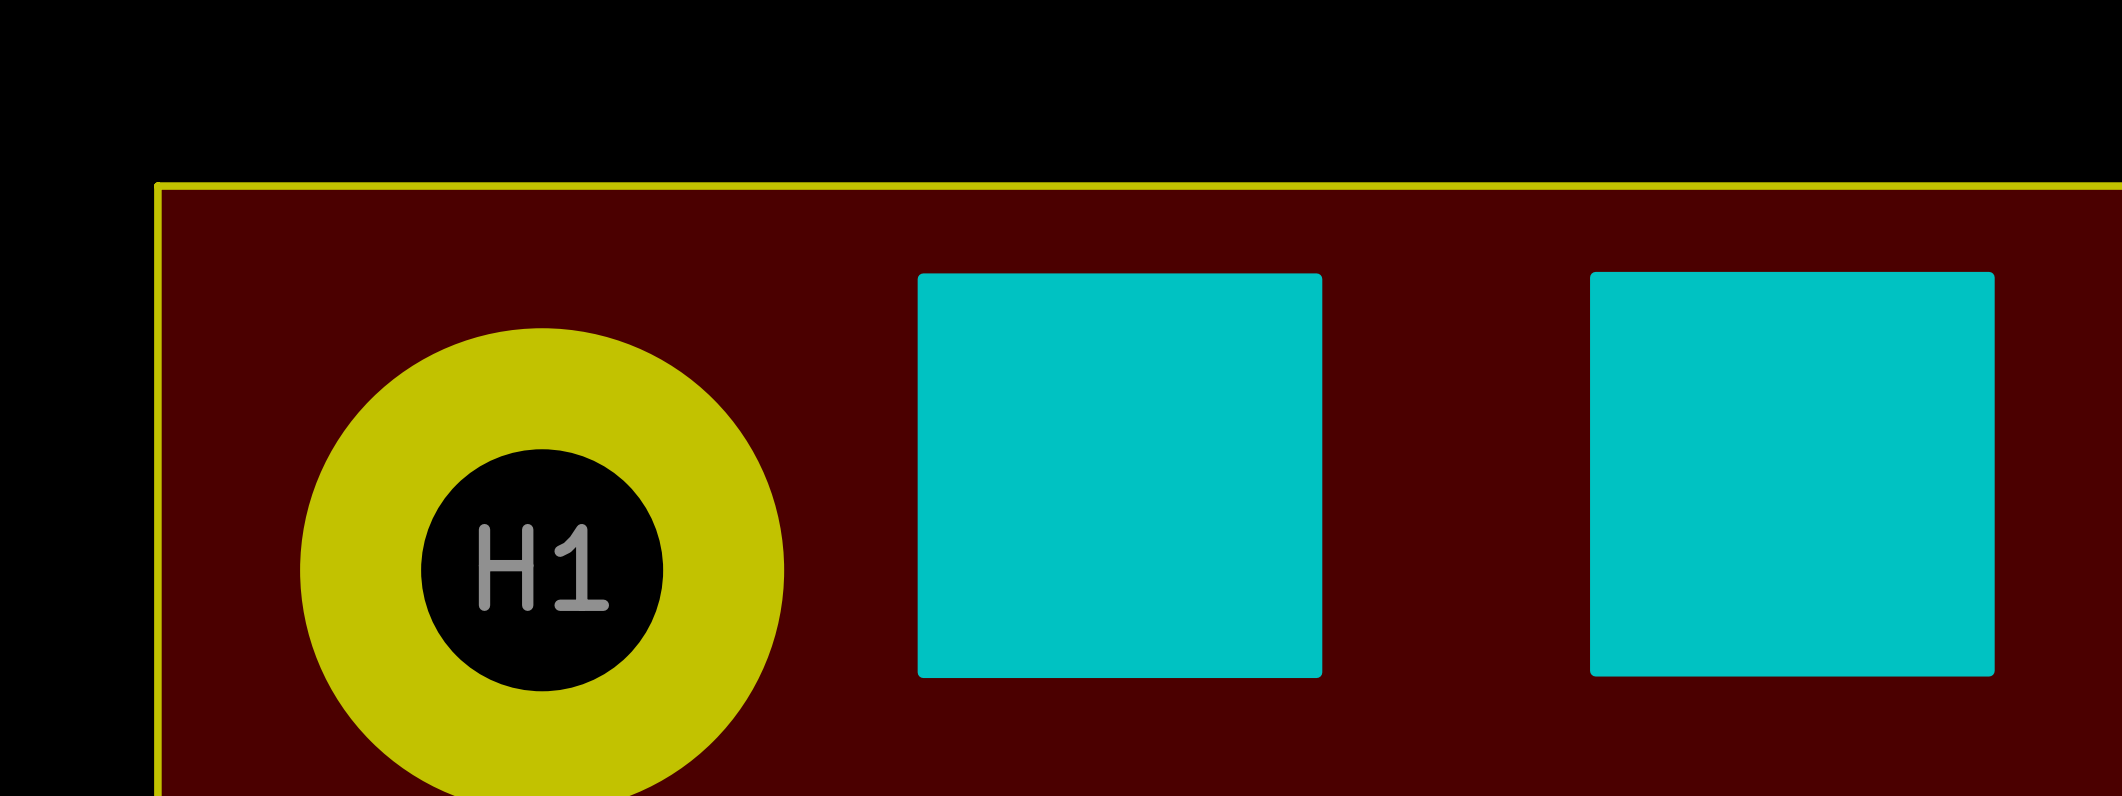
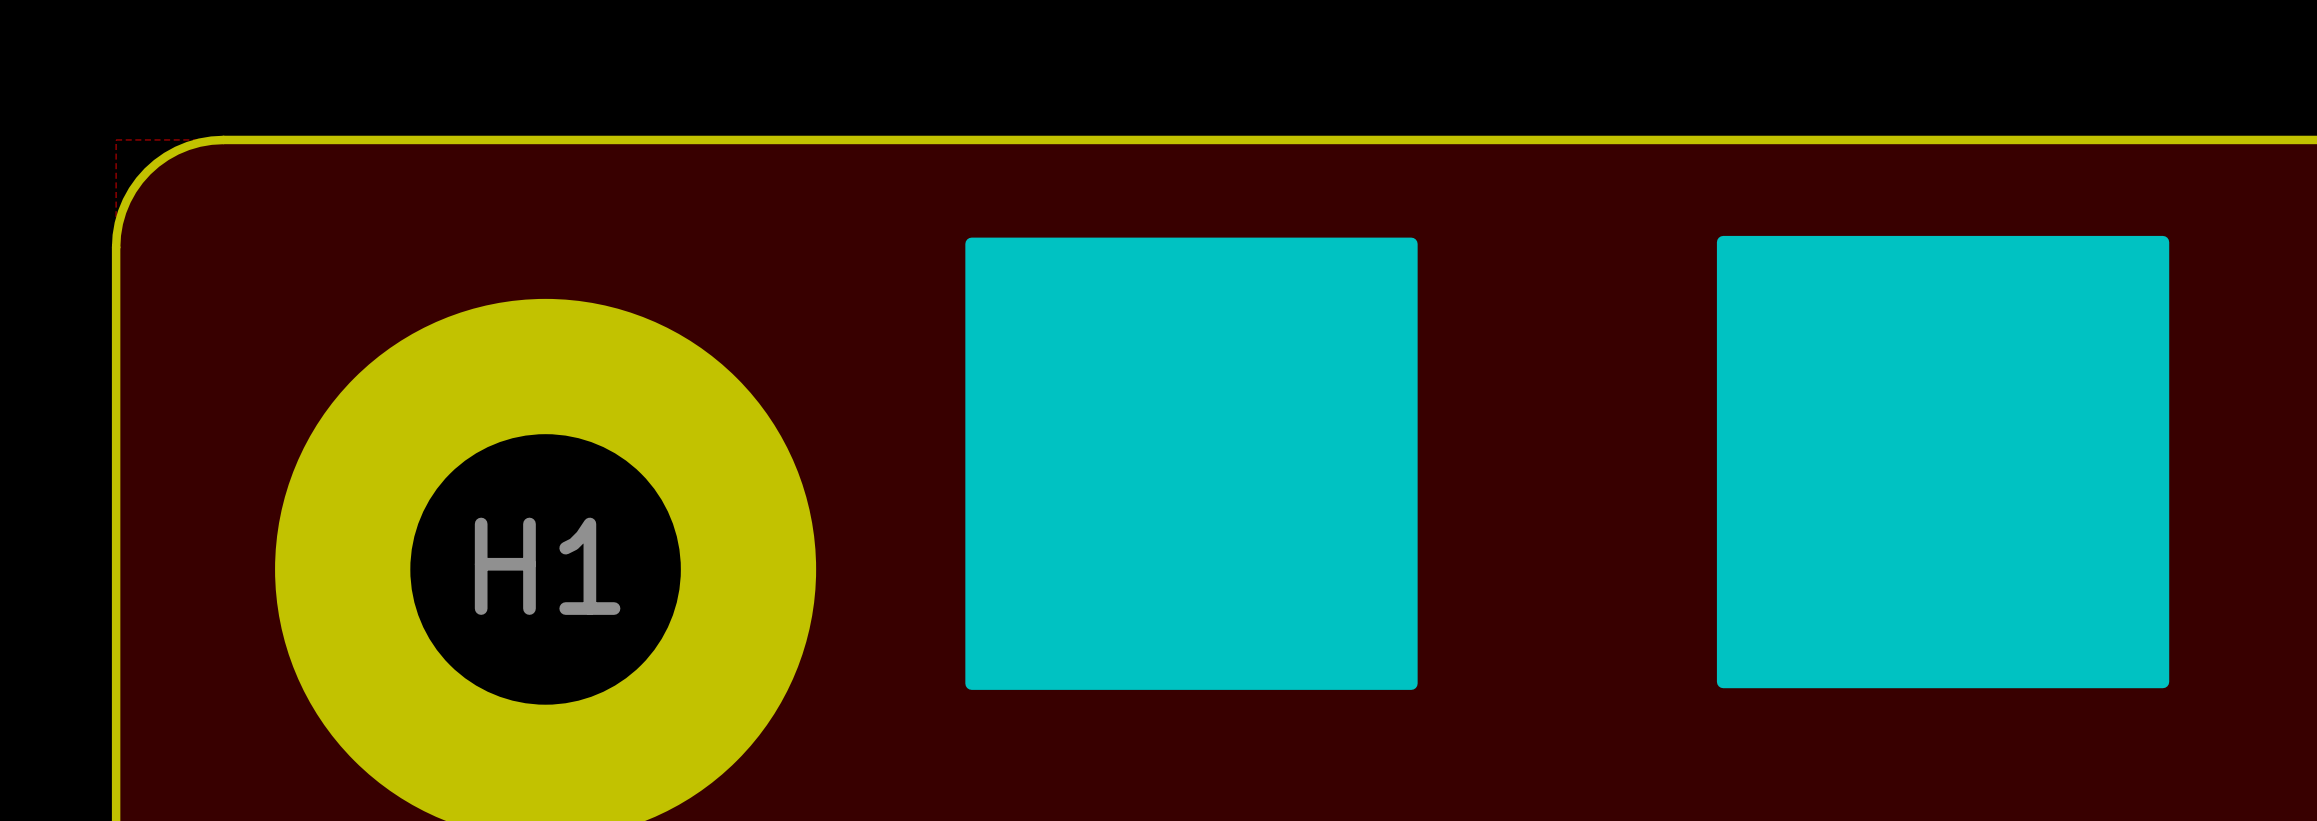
board edge: (253, 186) (157, 186) (157, 282) -> (223, 139) (188, 145) (166, 156) (147, 171) (132, 190) (122, 211) (116, 247)

